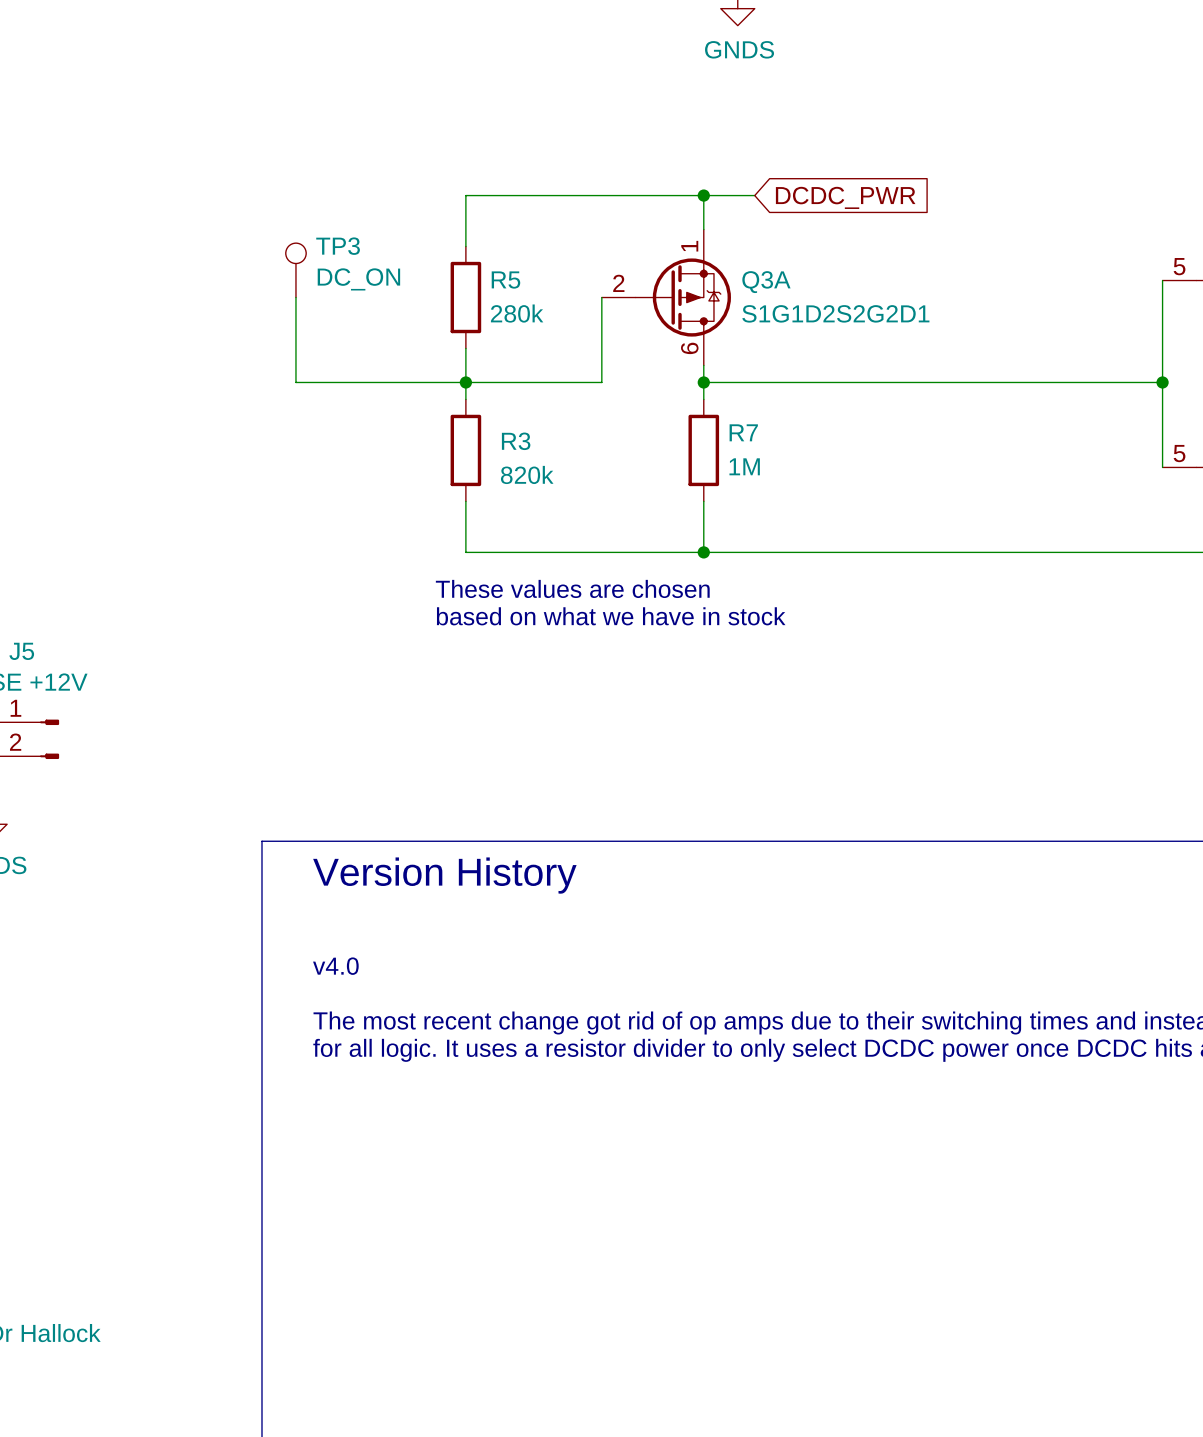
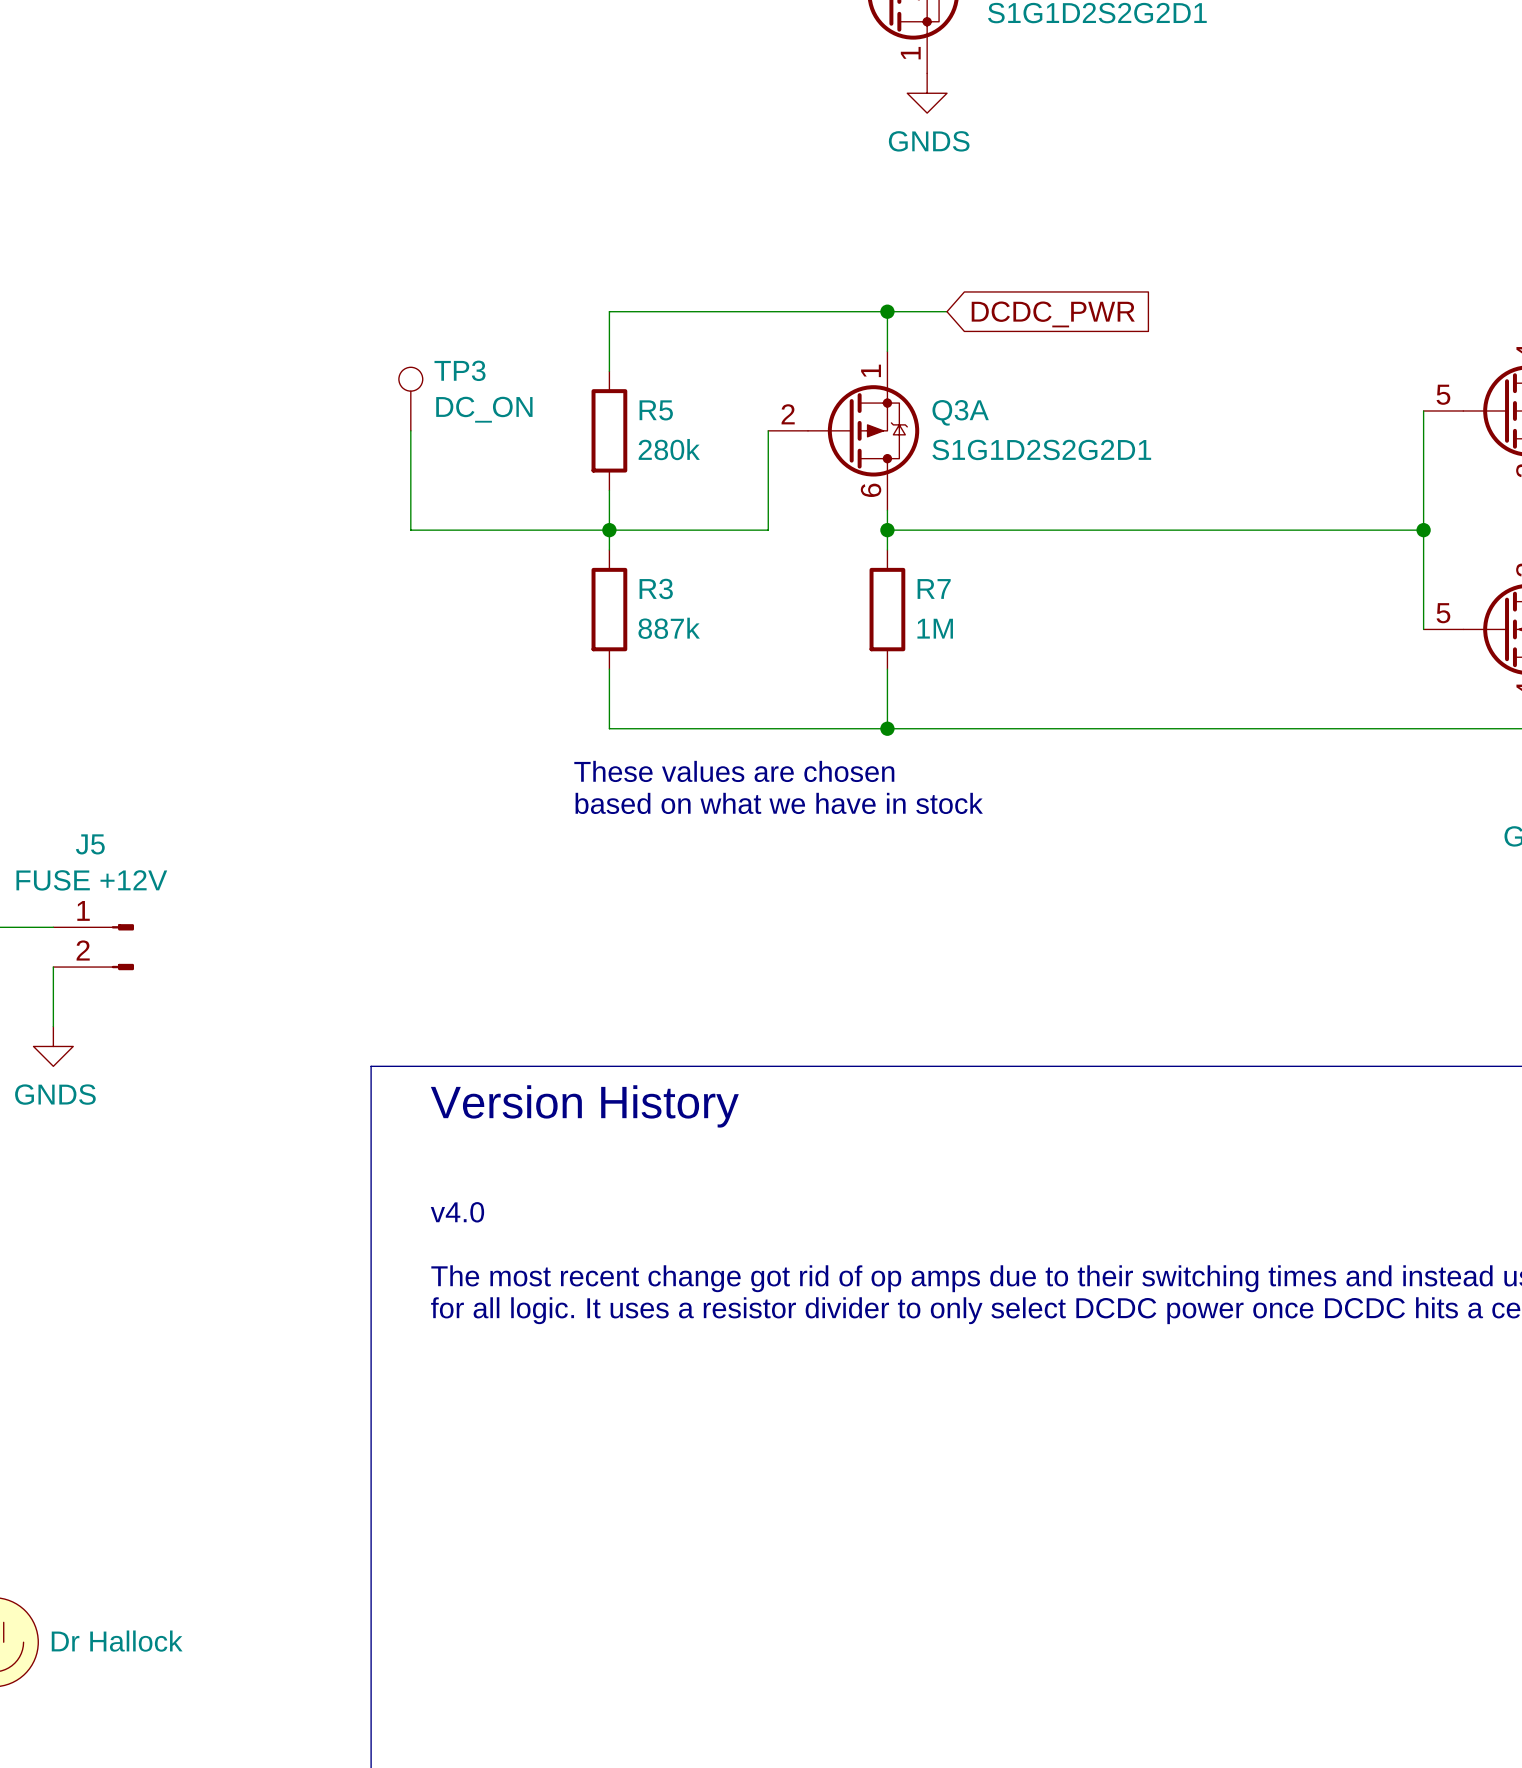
R3 name position: R3 (516, 441) -> R3 (656, 588)
R3 value: 820k (527, 474) -> 887k (669, 628)

